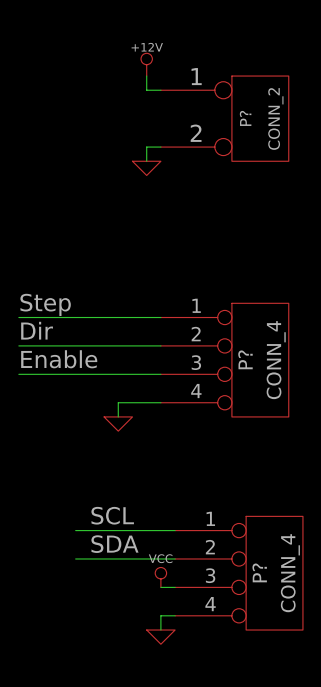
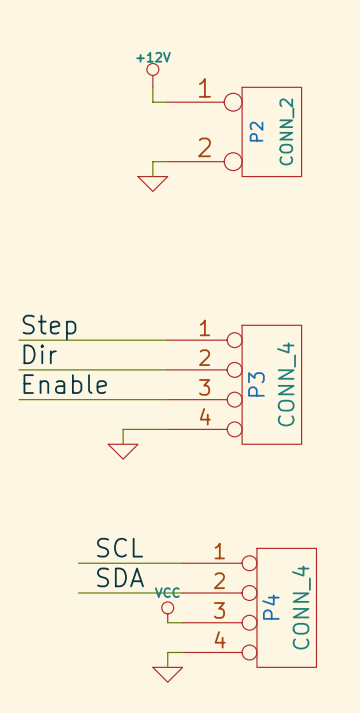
P? name: P? (245, 118) -> P2 (256, 131)
P? name: P? (245, 359) -> P3 (256, 384)
P? name: P? (259, 572) -> P4 (270, 607)

